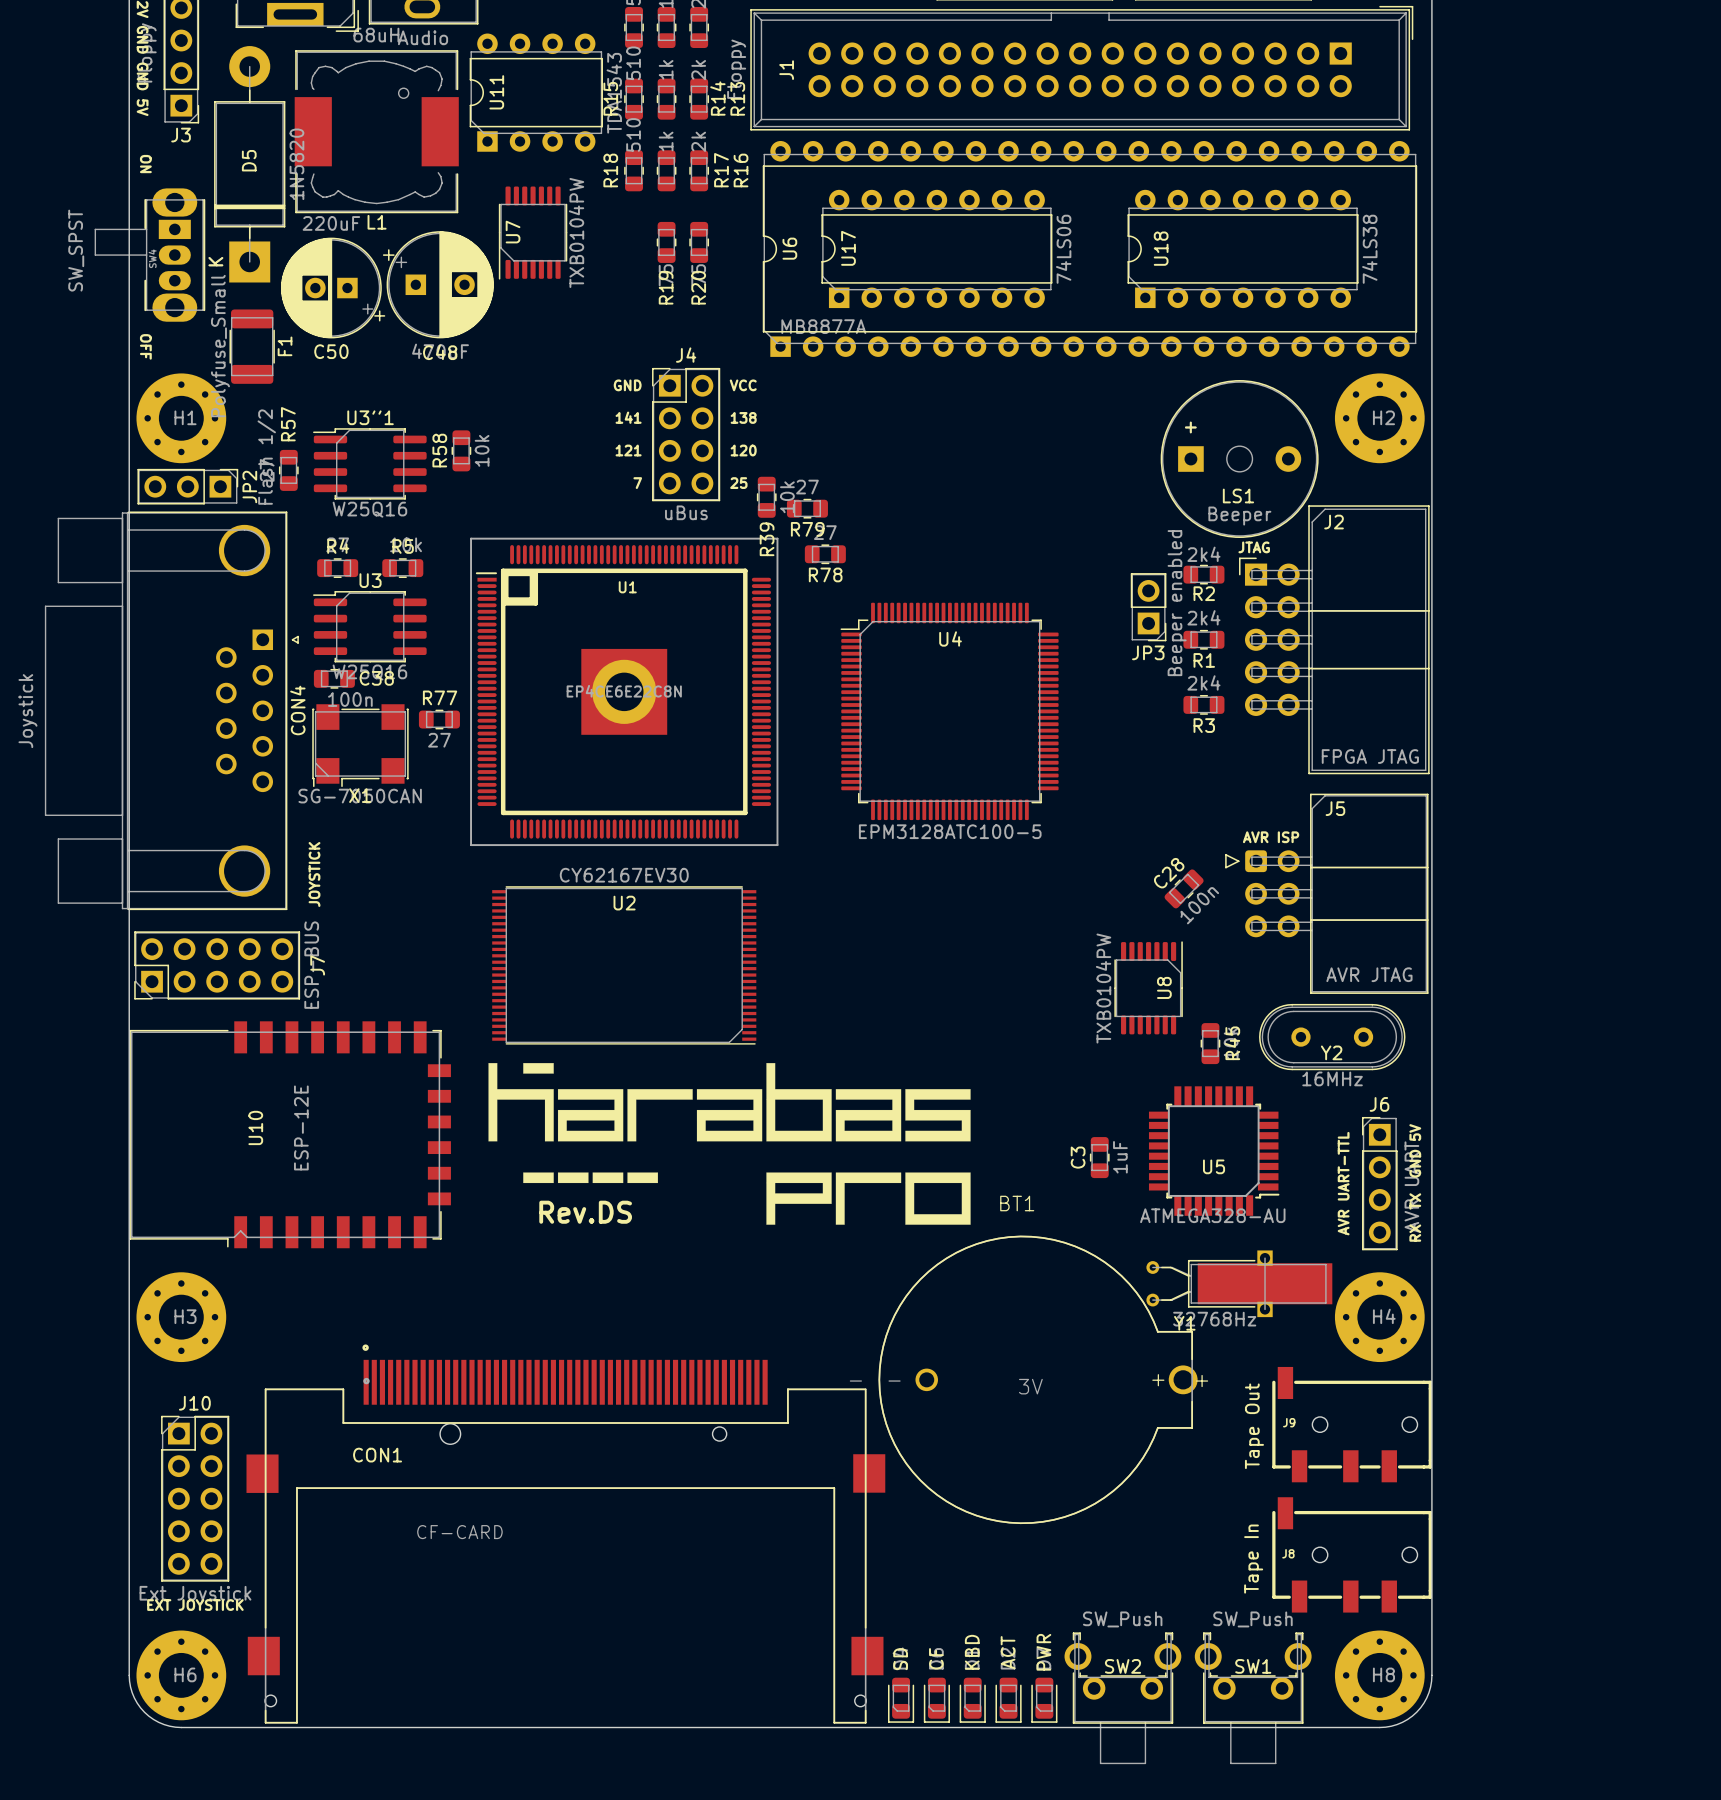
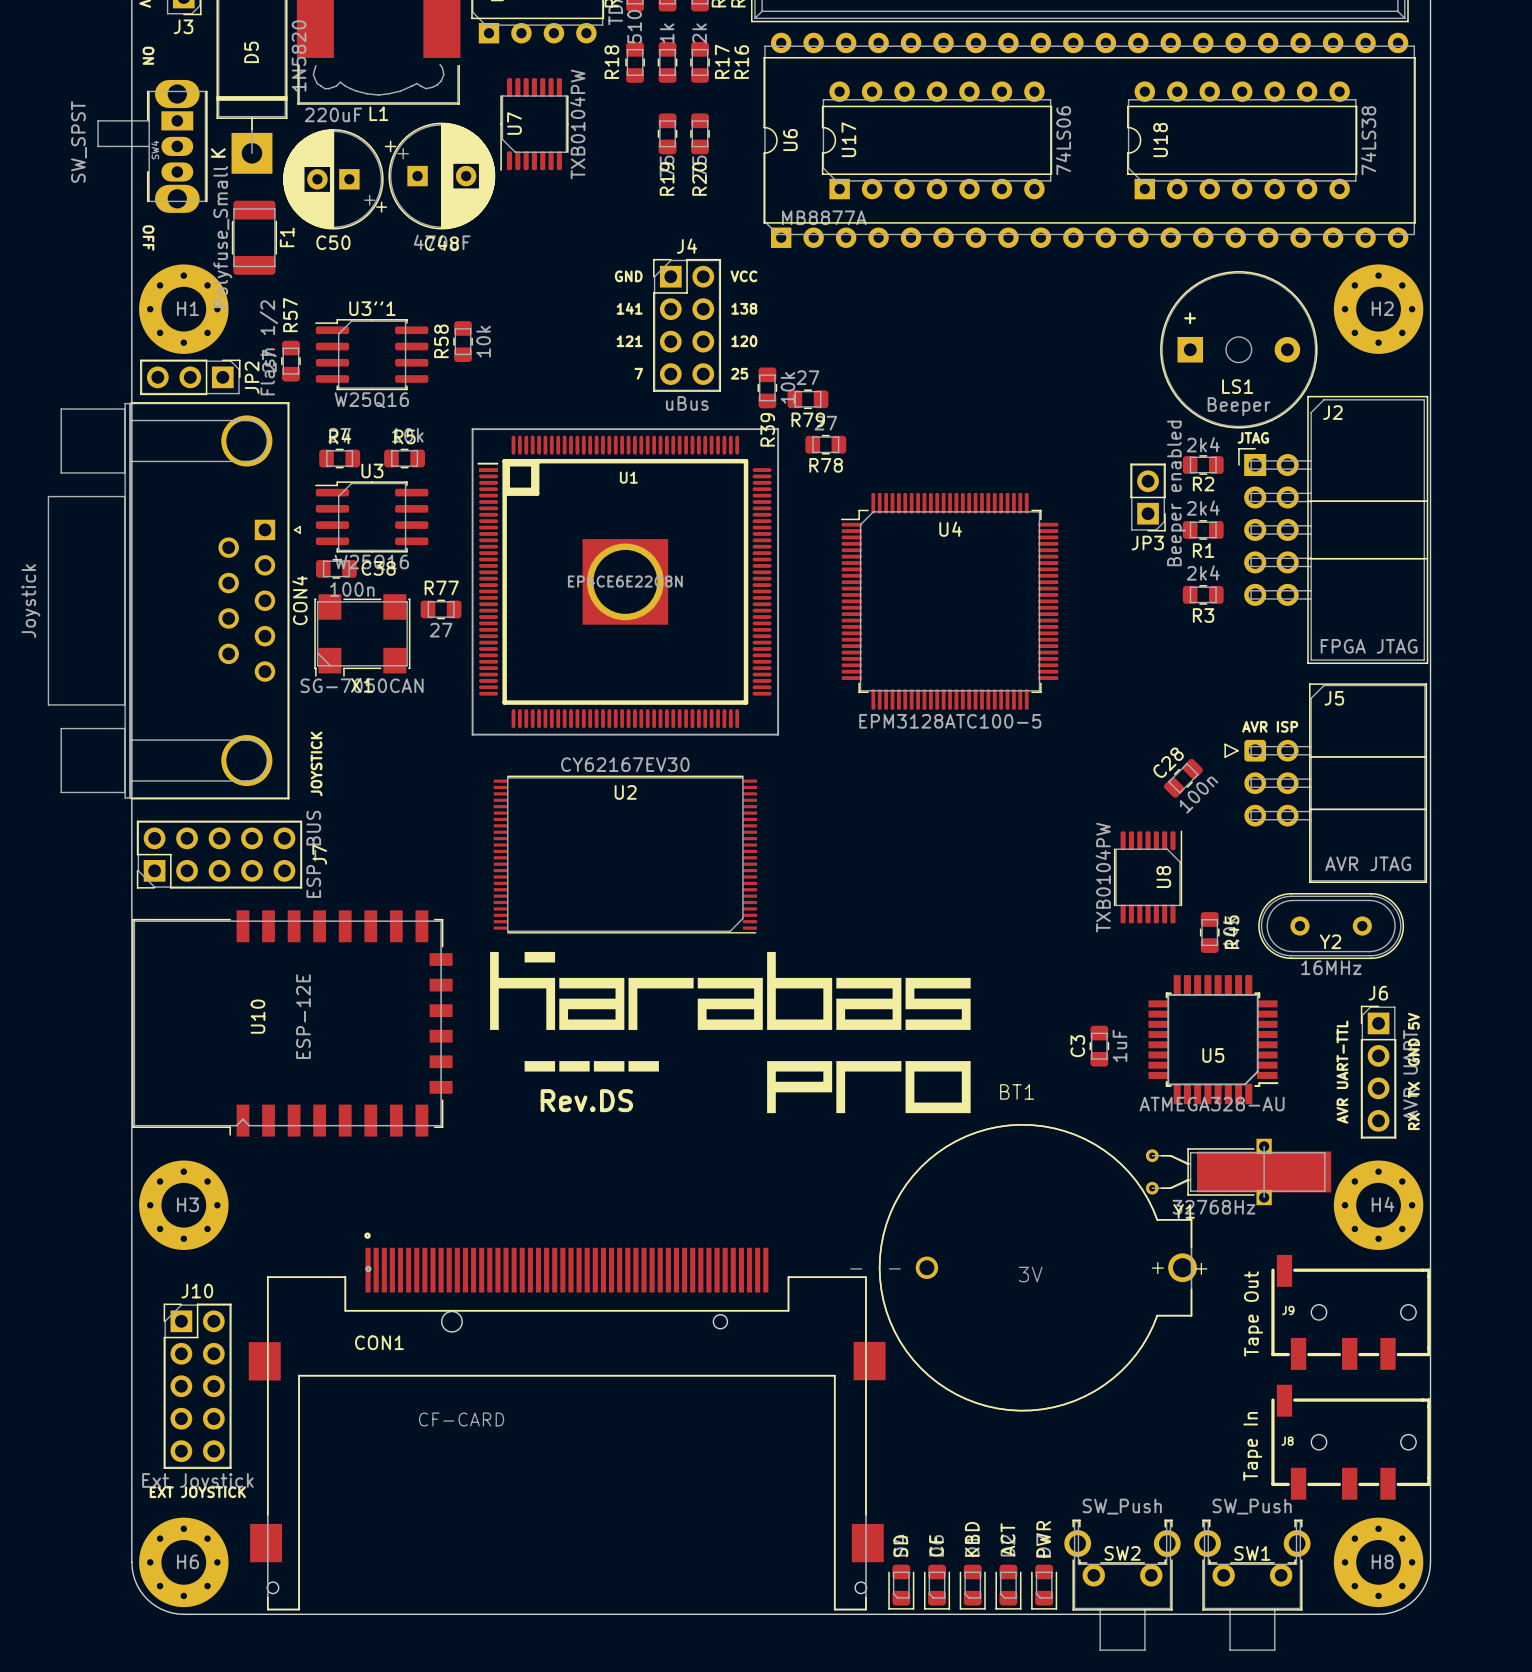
U1 footprint: [470, 537, 779, 847] -> [471, 428, 780, 736]

